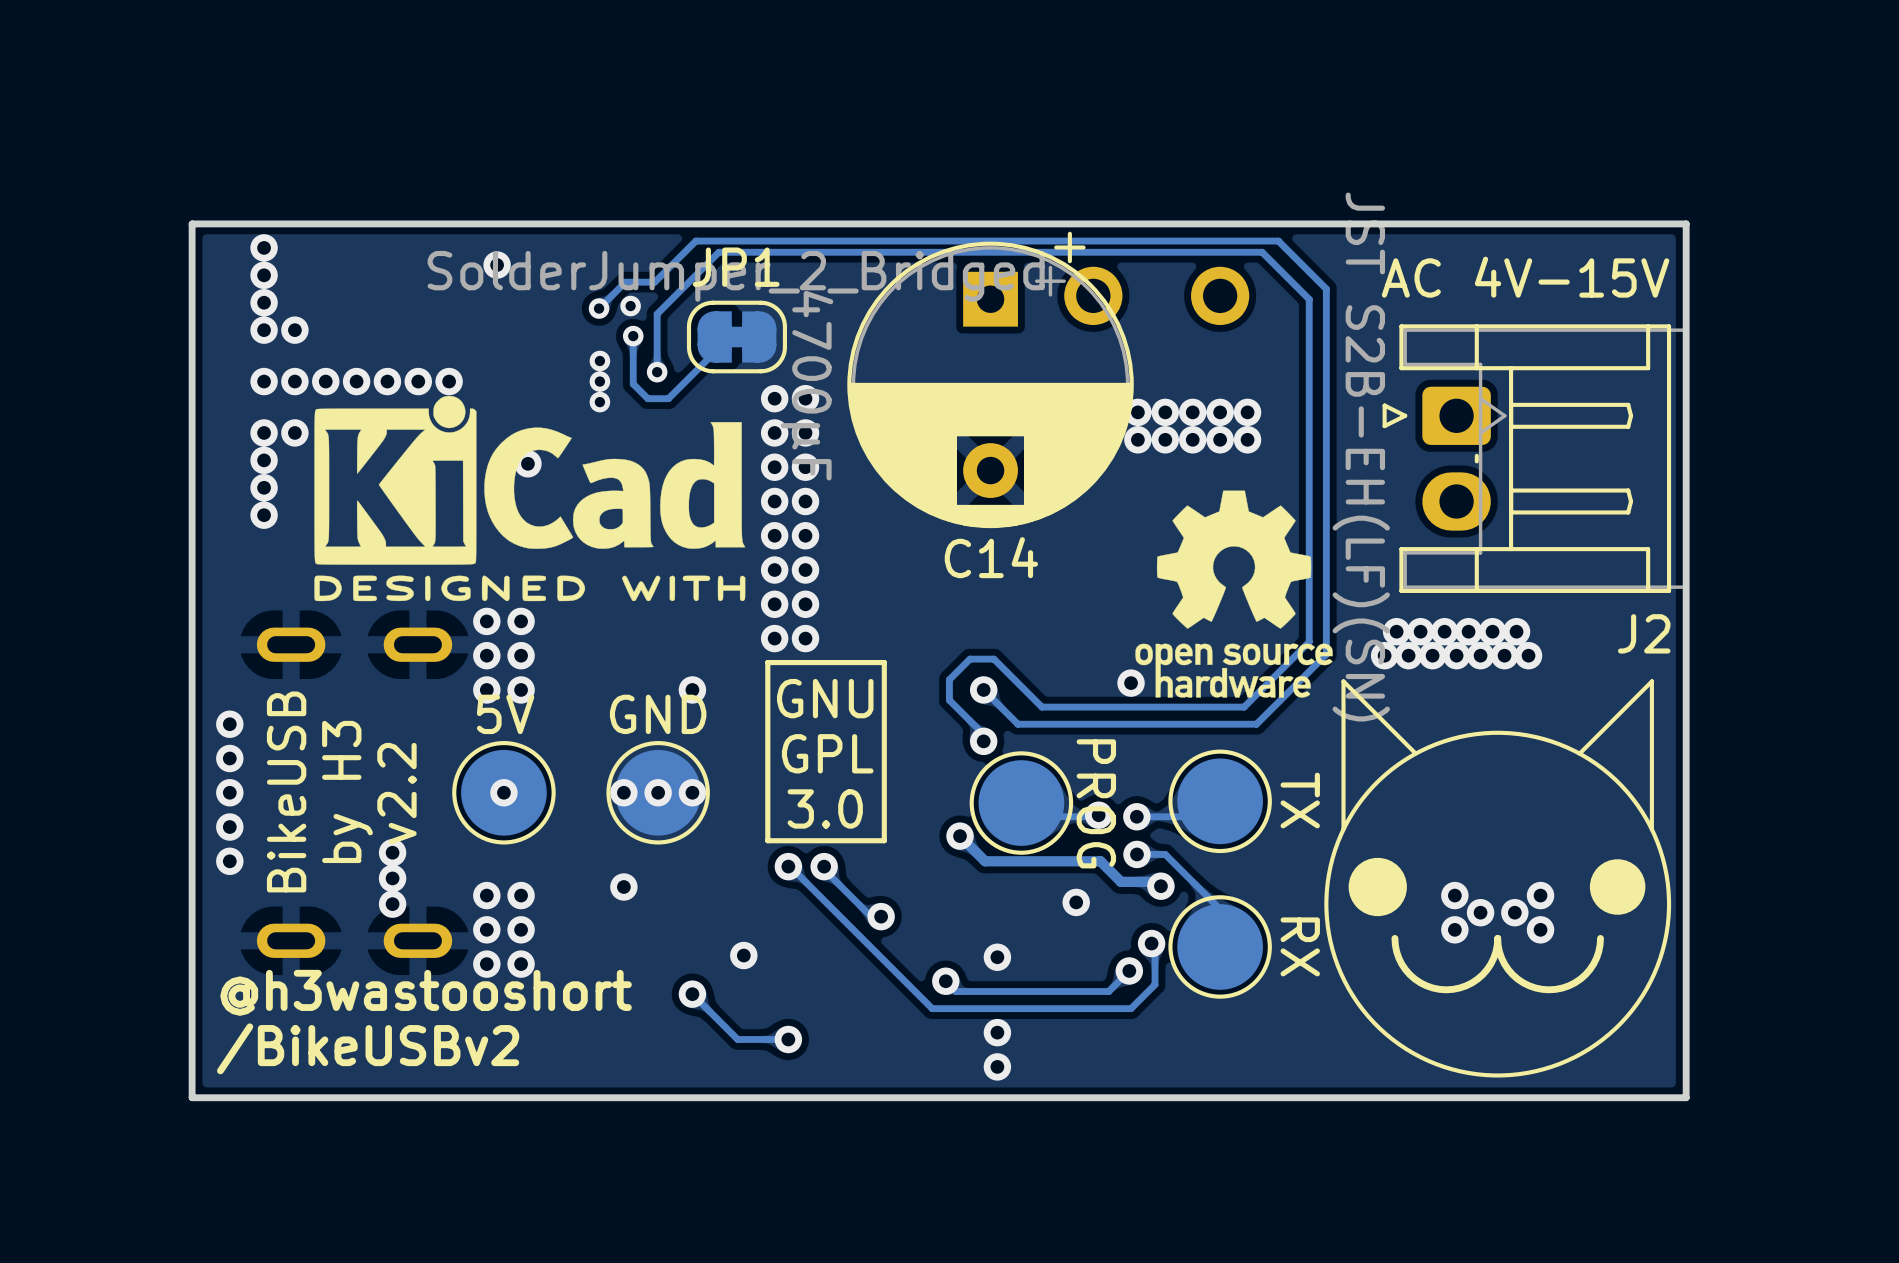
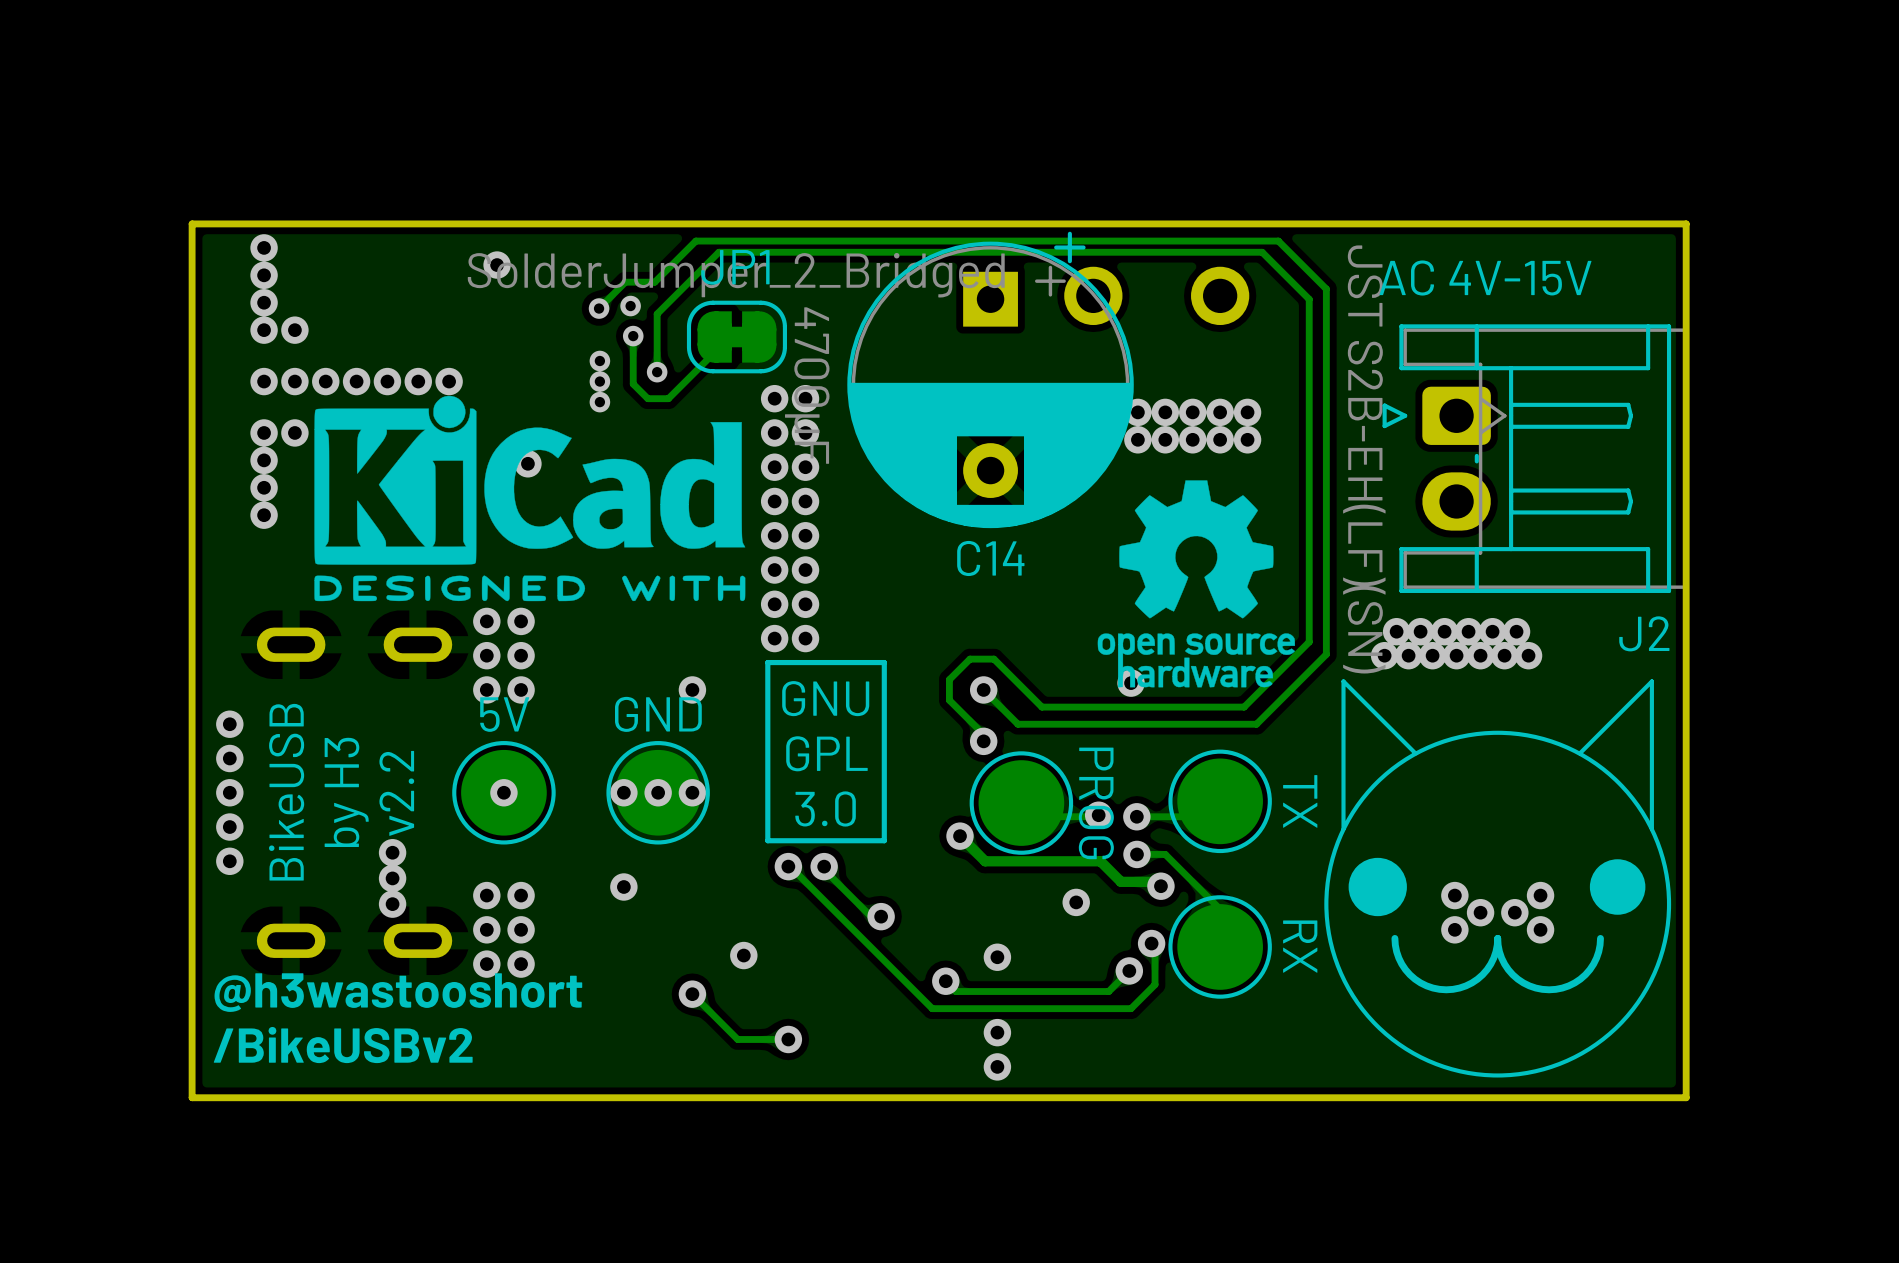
drawing position: (1234, 594) -> (1196, 583)

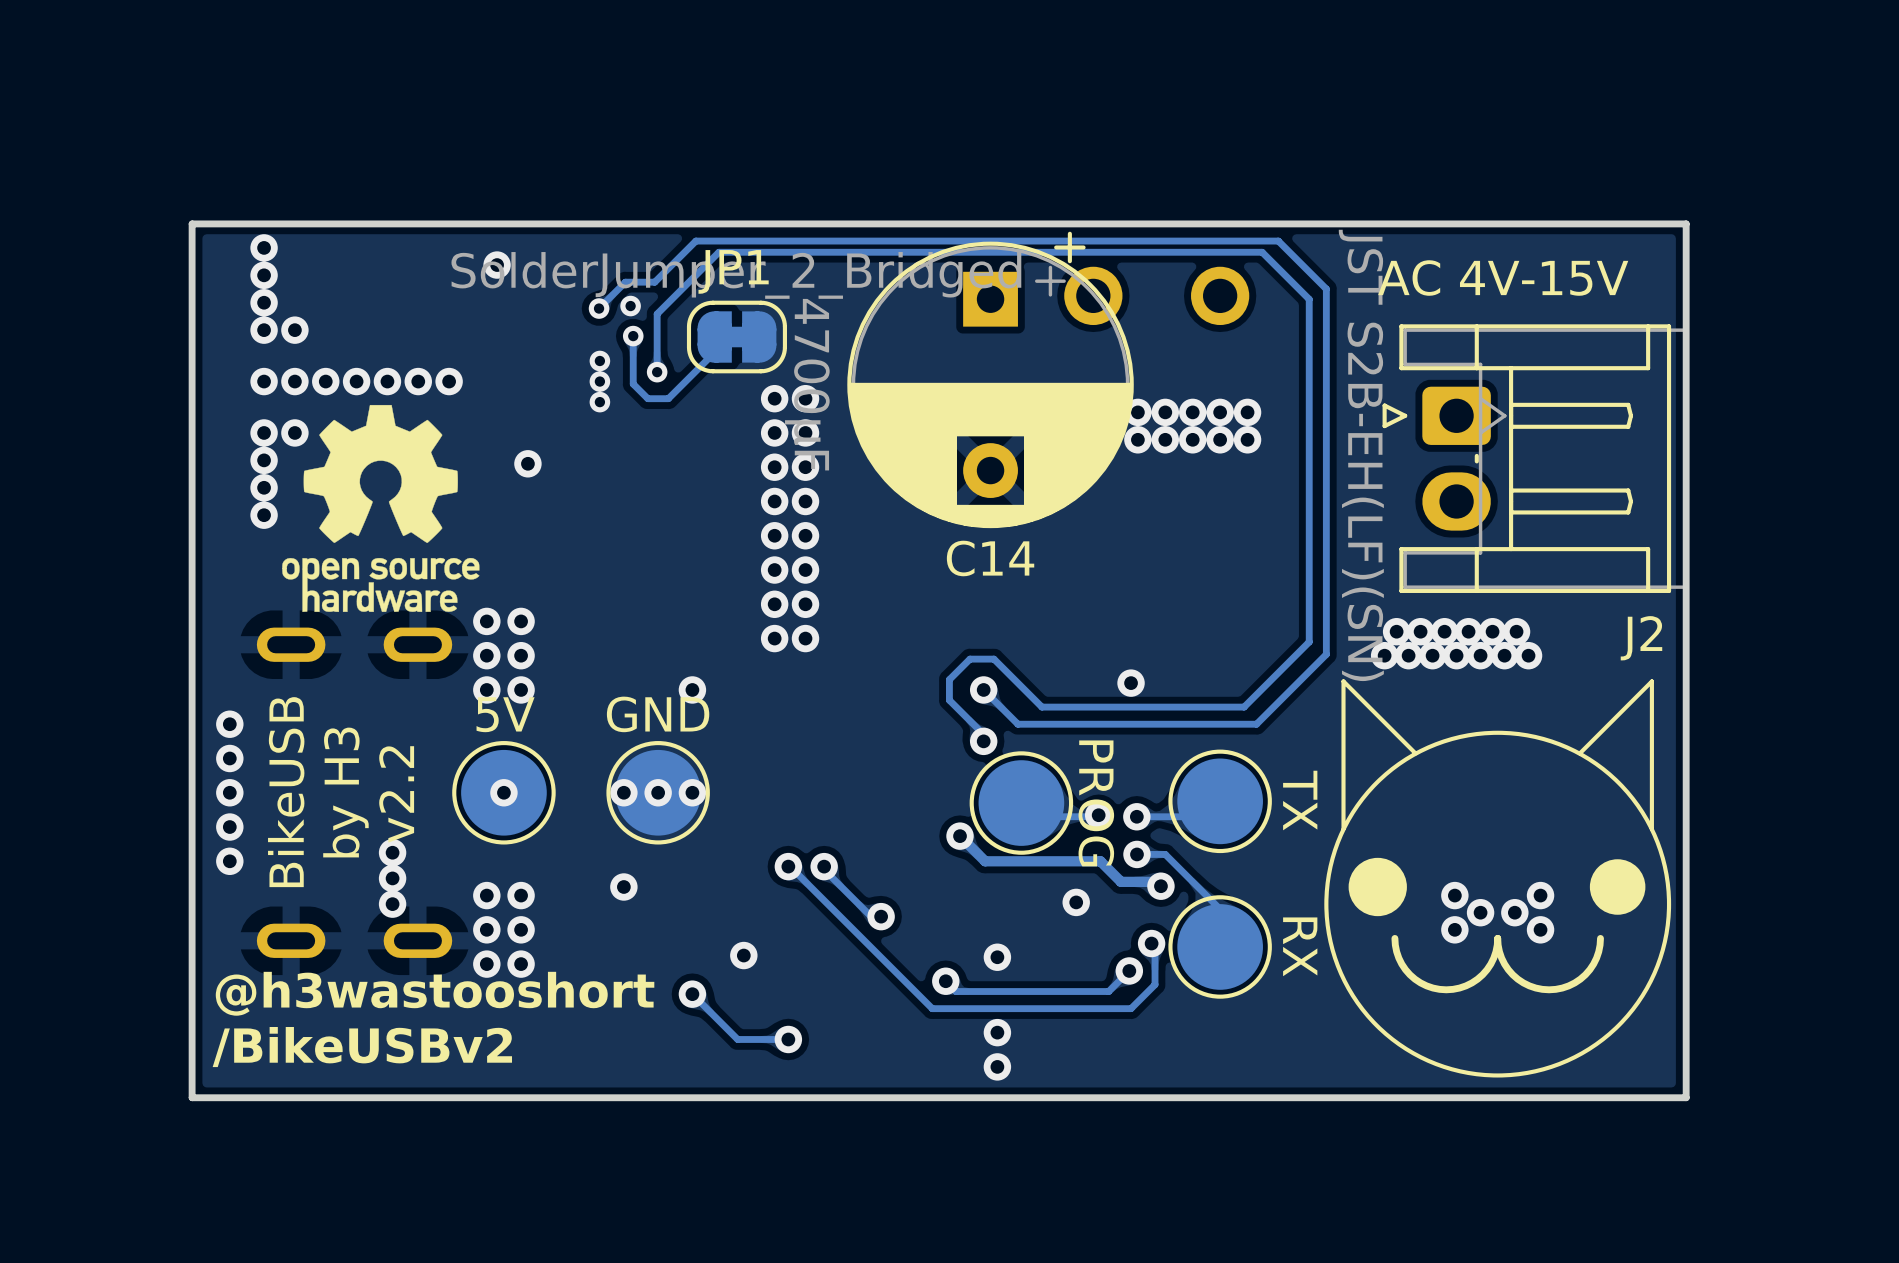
drawing: [314, 395, 746, 602] -> none
drawing position: (1196, 583) -> (380, 508)
line: (884, 662) (767, 662) (767, 840) (884, 840) (884, 662) -> none
text: GNU (825, 698) -> none
text: GPL (826, 753) -> none
text: 3.0 (825, 808) -> none

